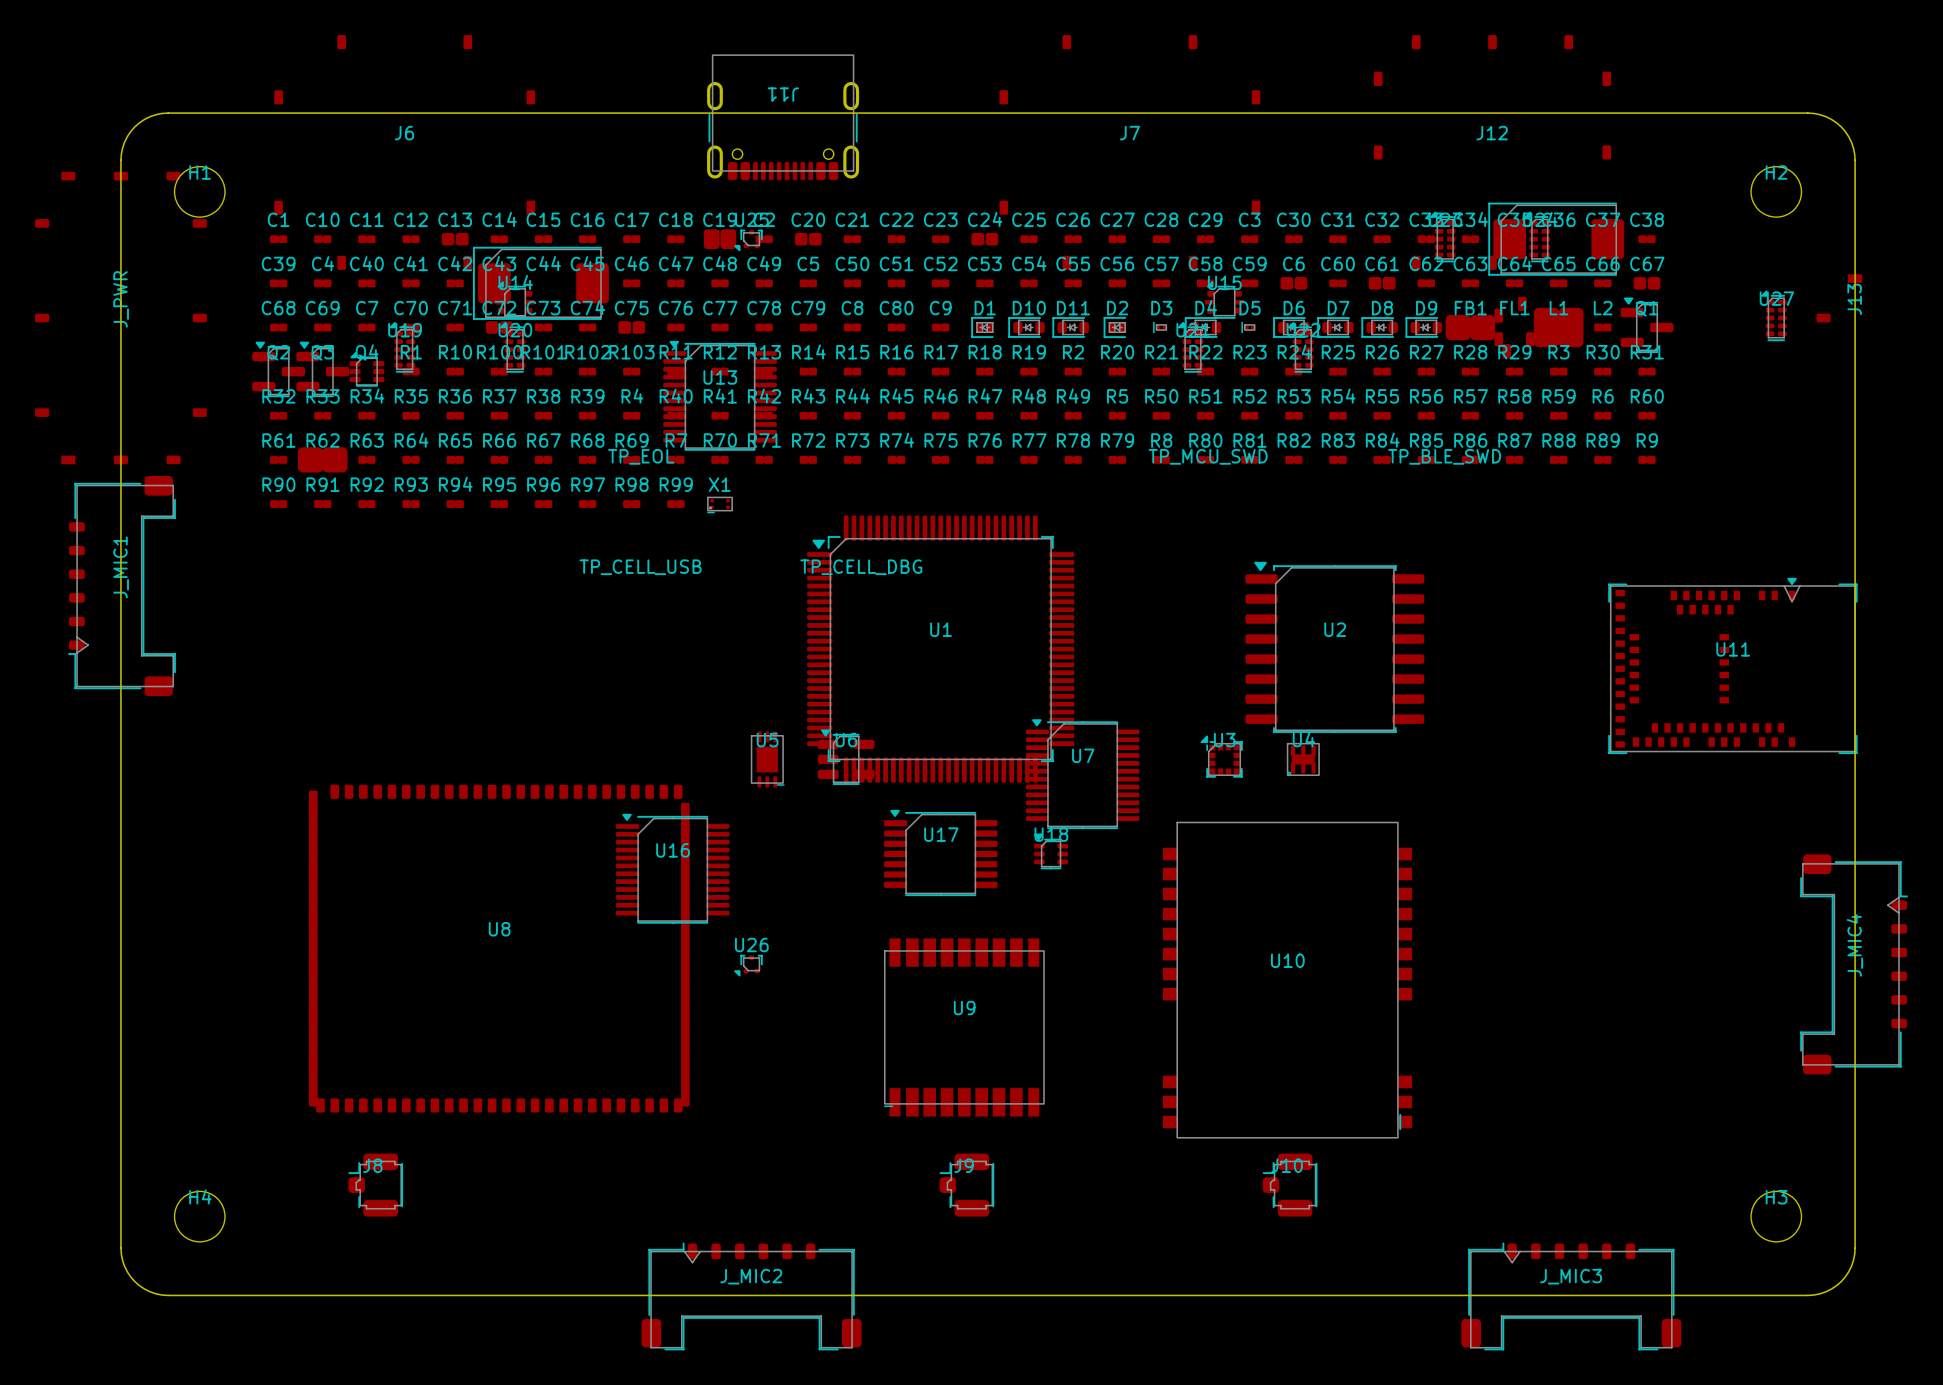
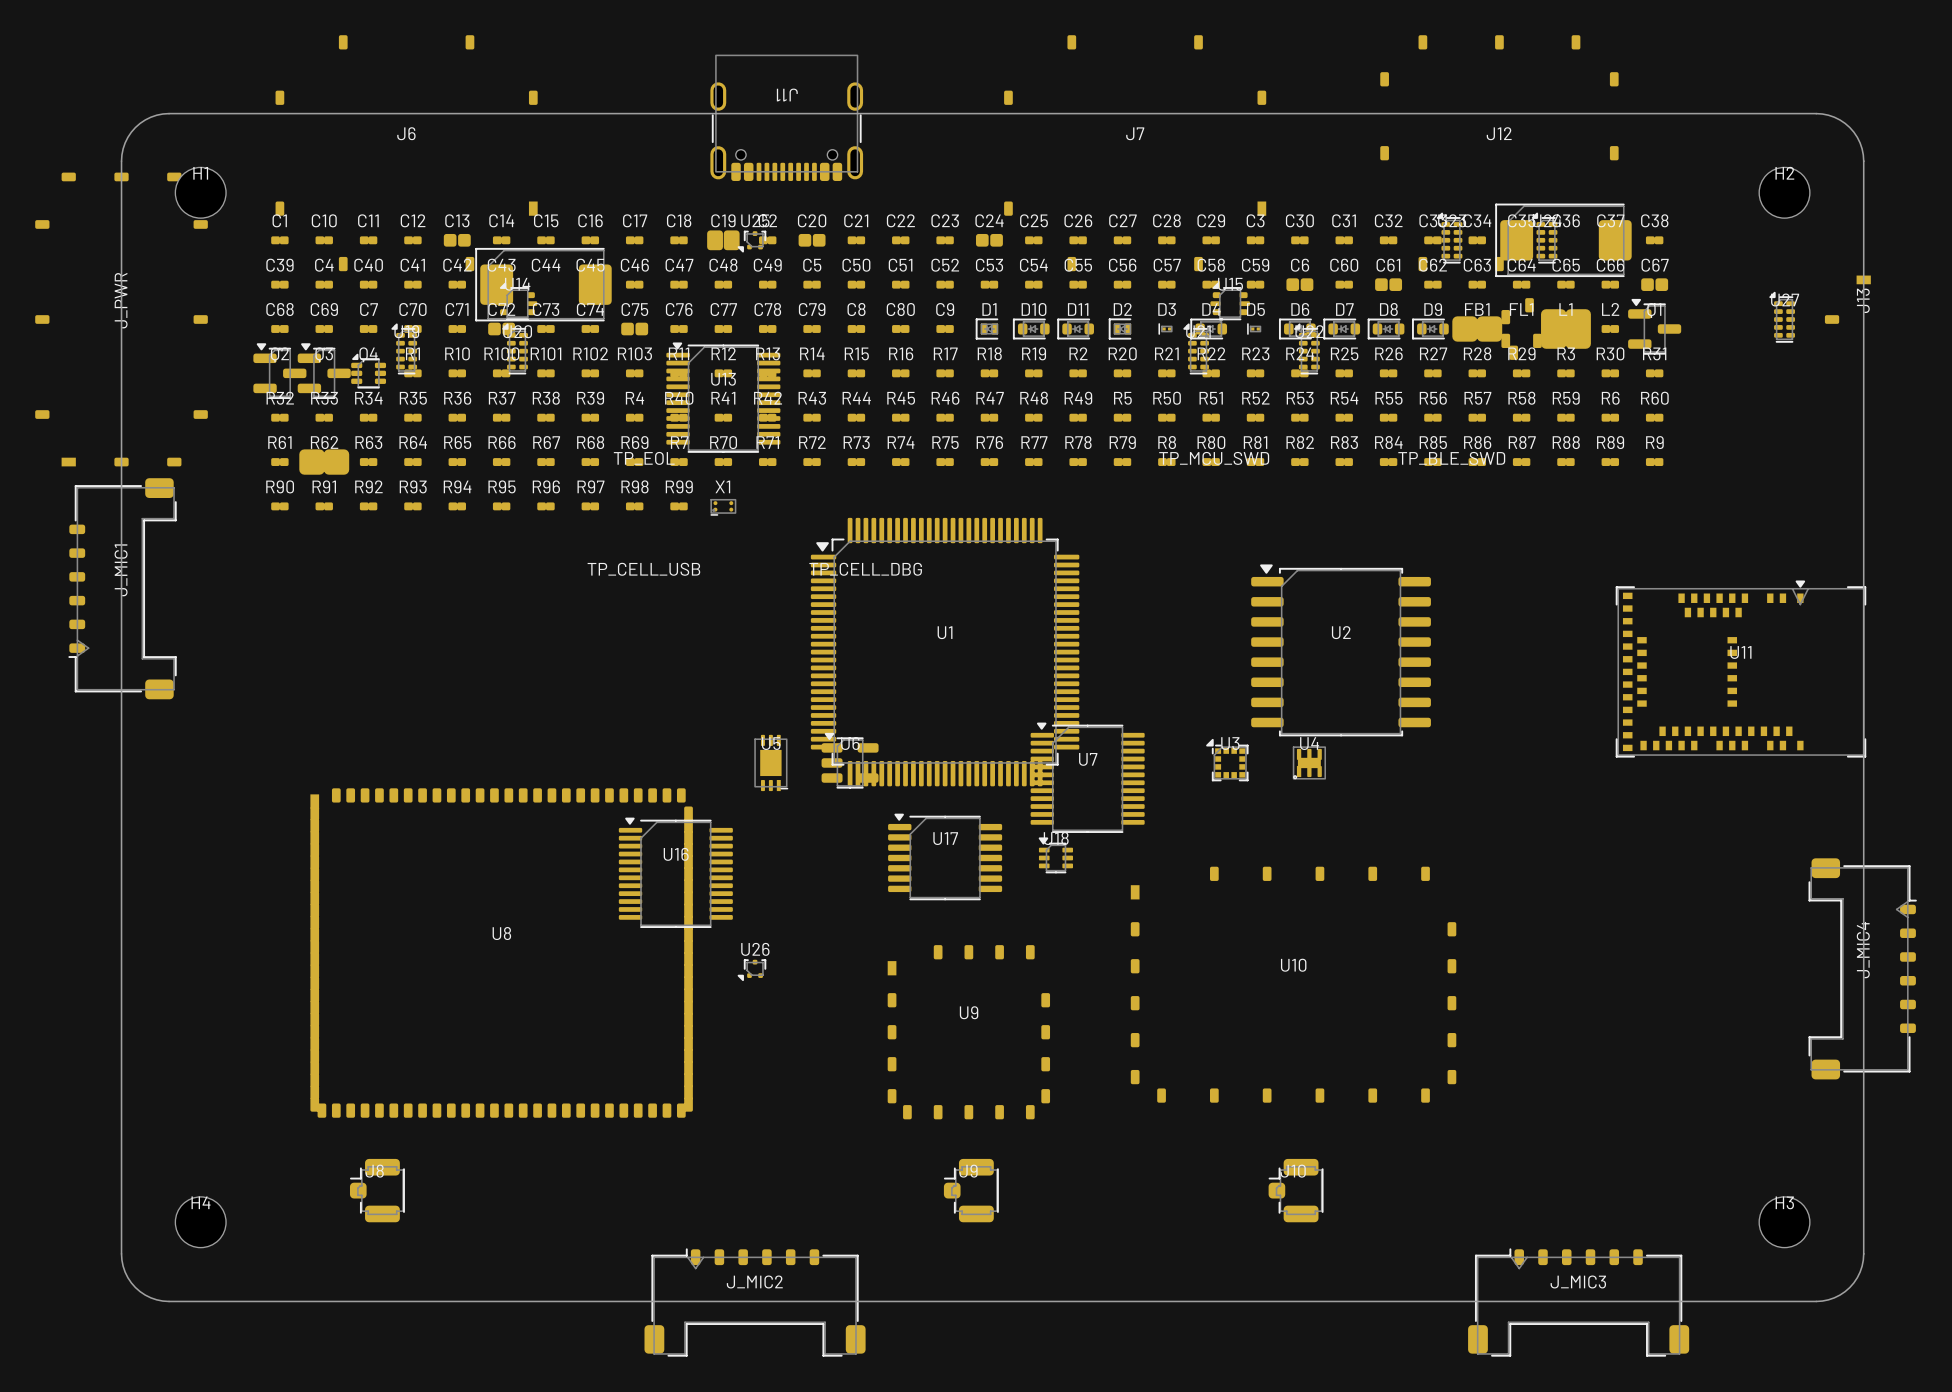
U10 footprint: [1163, 821, 1413, 1139] -> [1130, 866, 1457, 1103]
U9 footprint: [883, 938, 1045, 1117] -> [887, 945, 1051, 1120]

